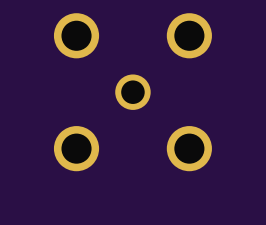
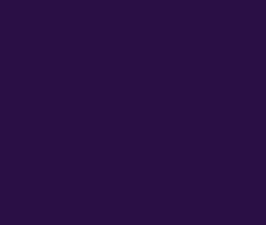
part: (132, 92) -> none

